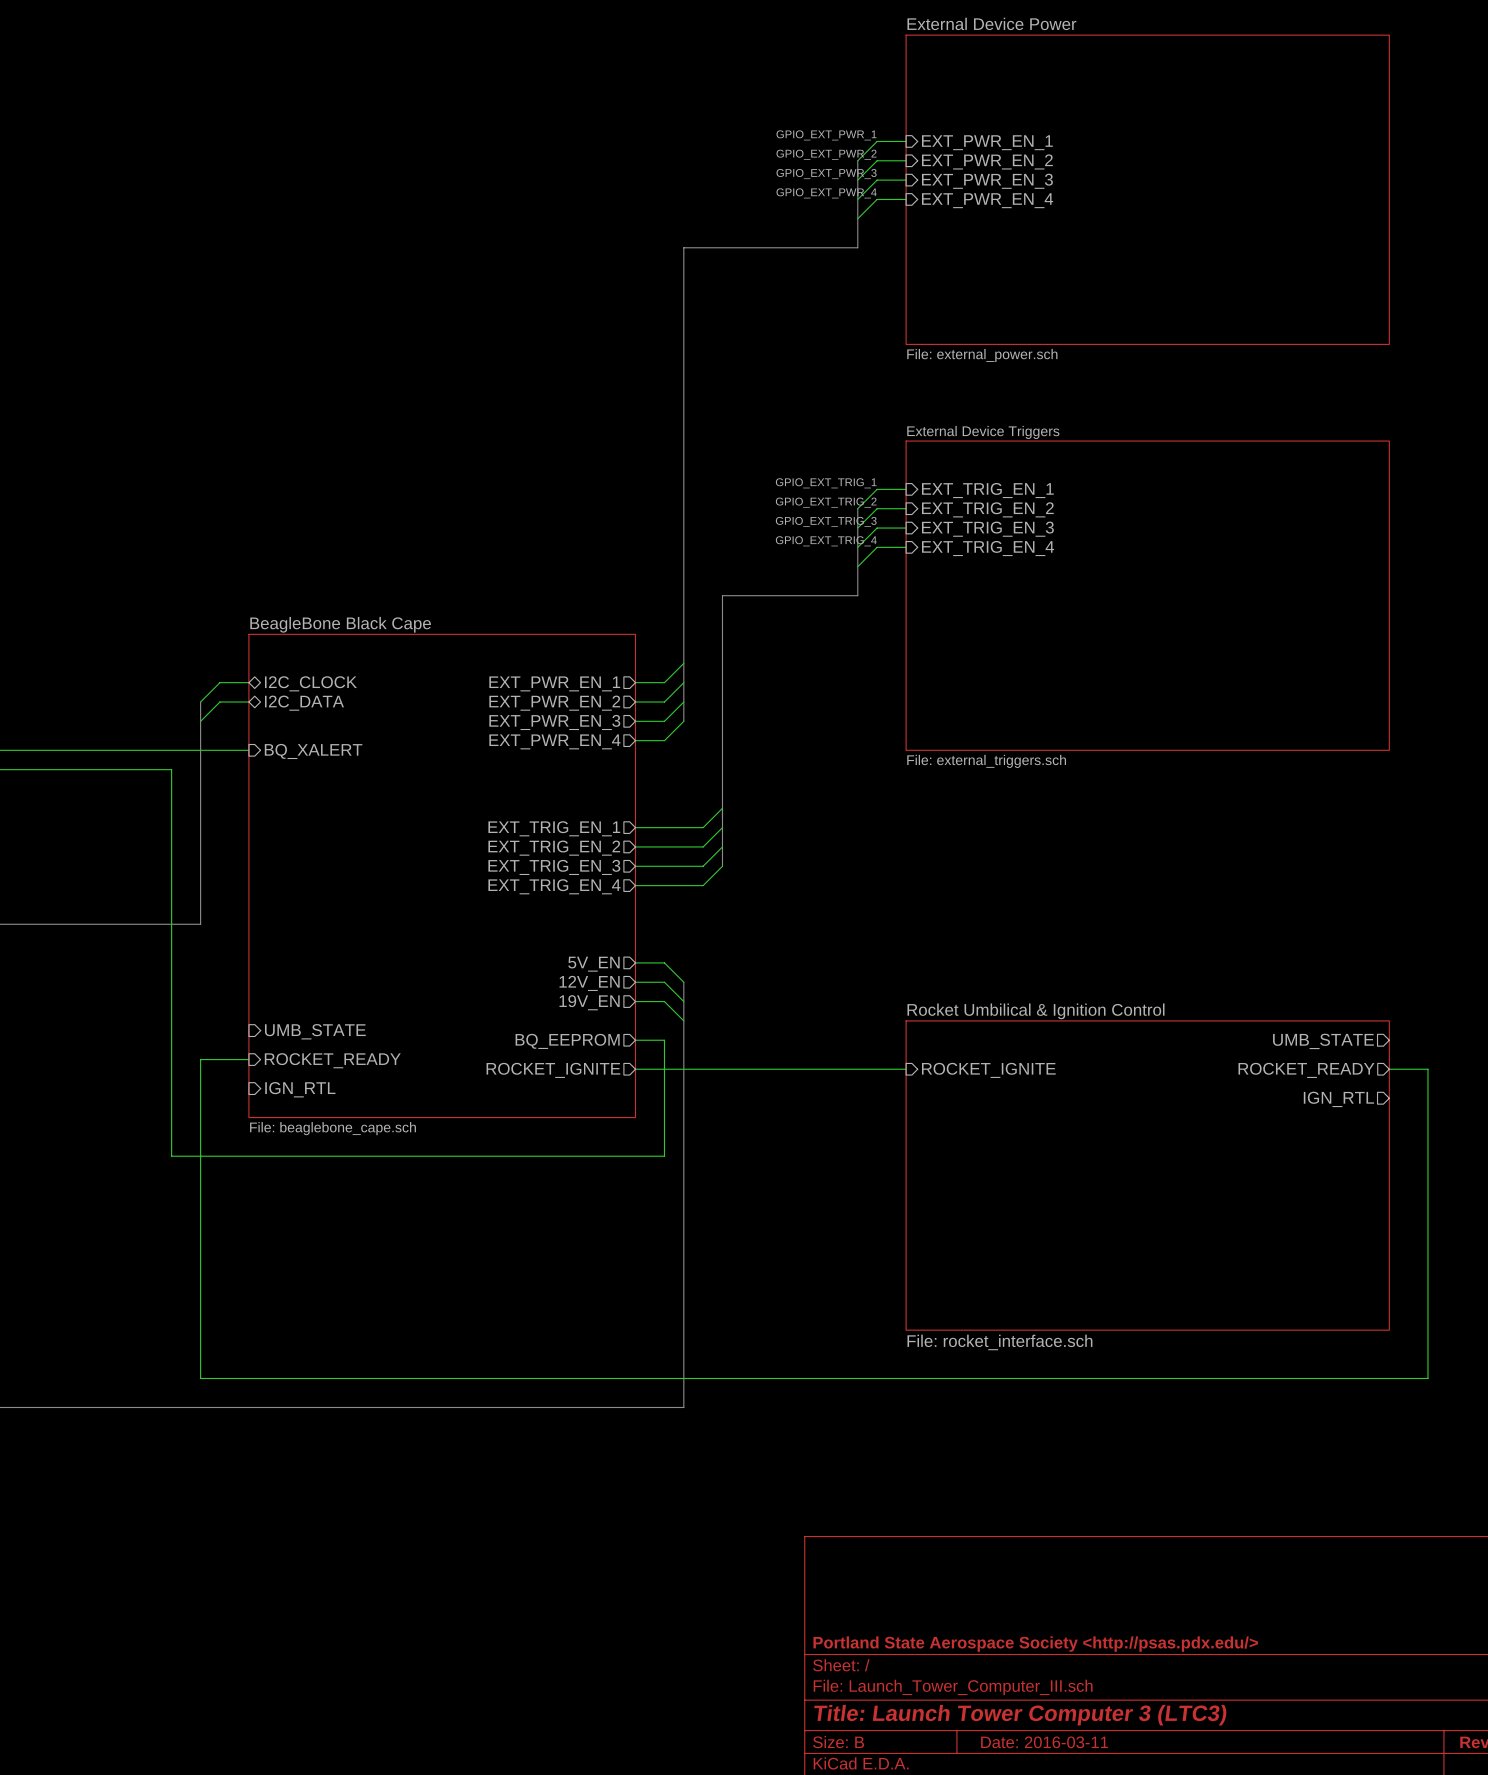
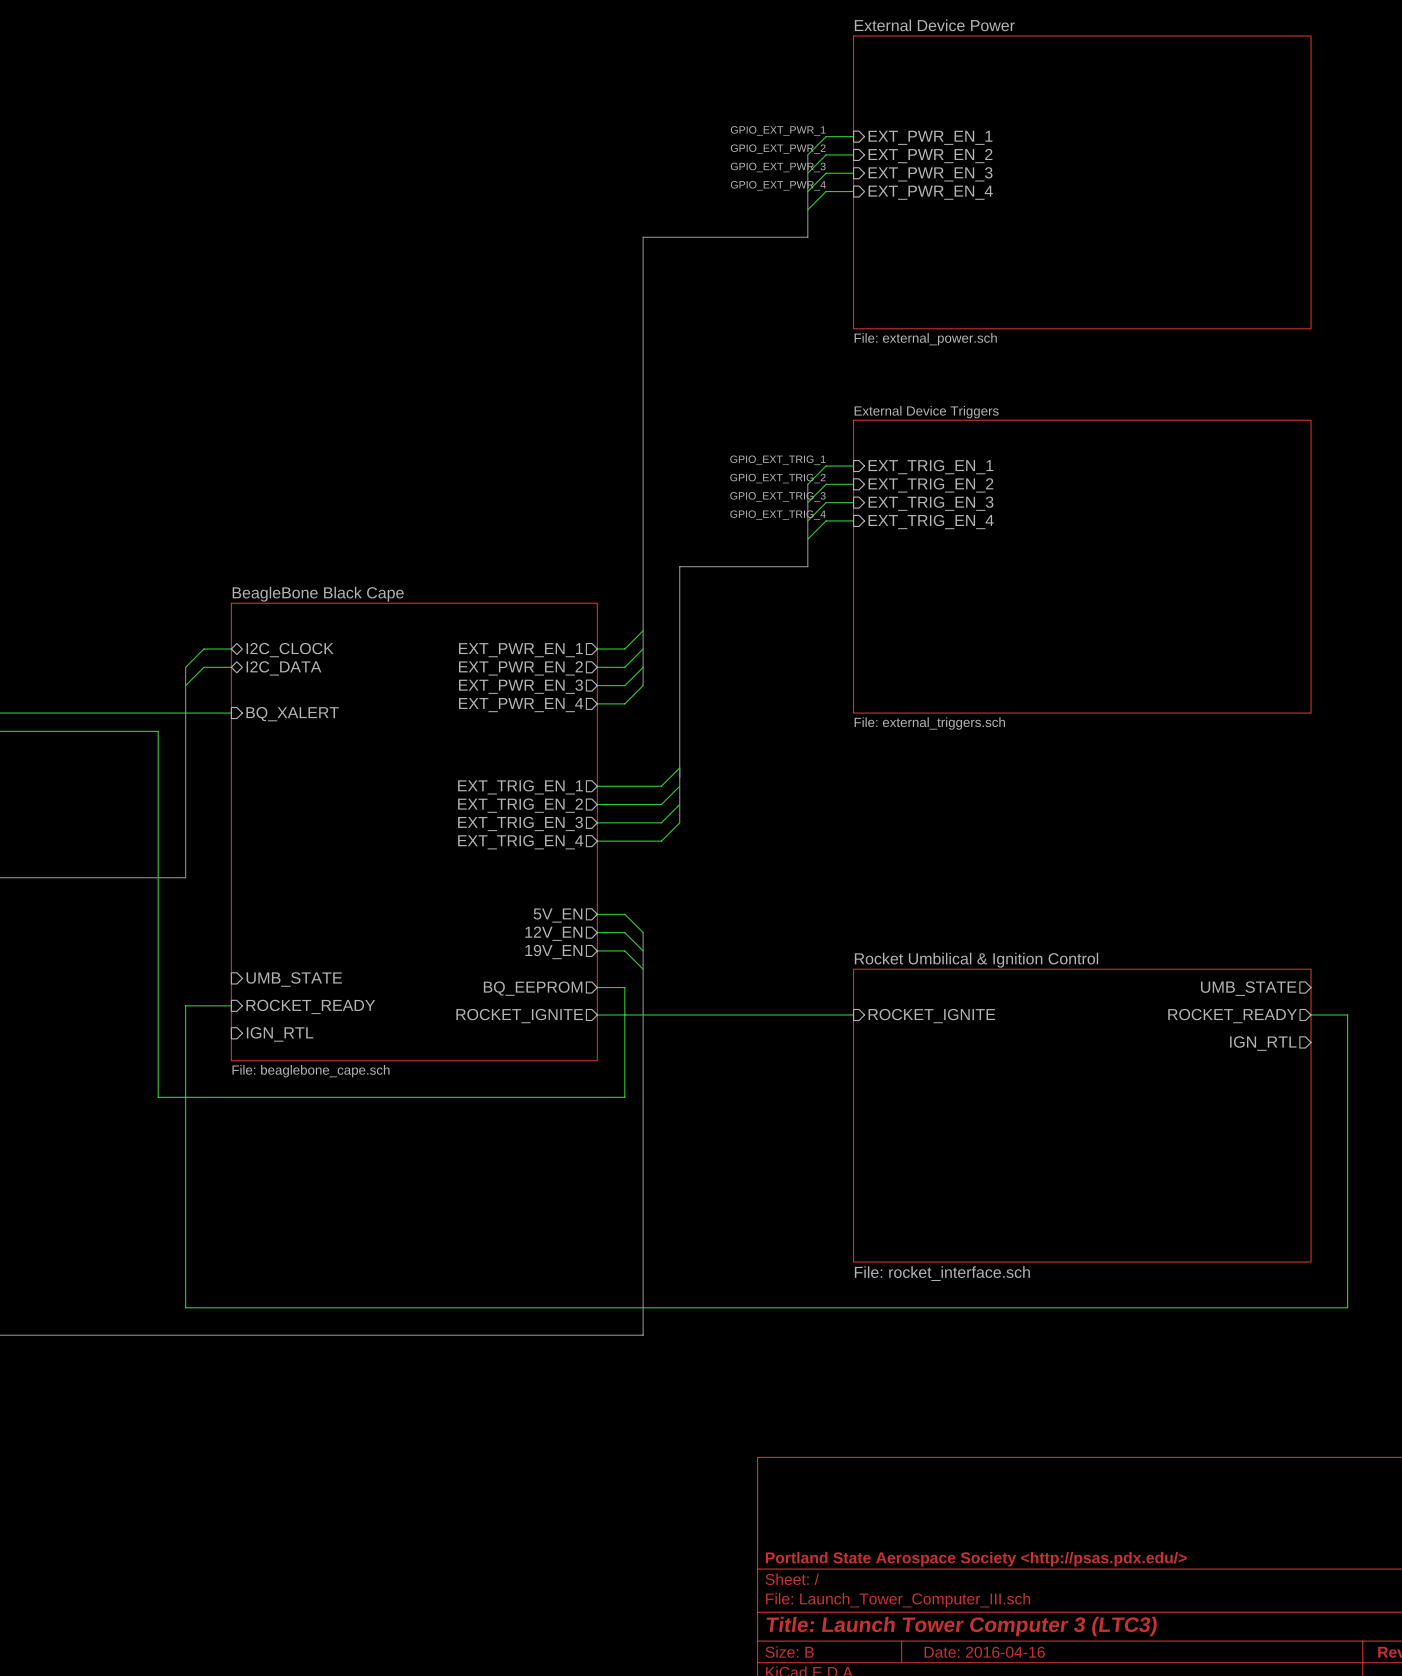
title block: Date: 2016-03-11 (1044, 1742) -> Date: 2016-04-16 (984, 1652)

